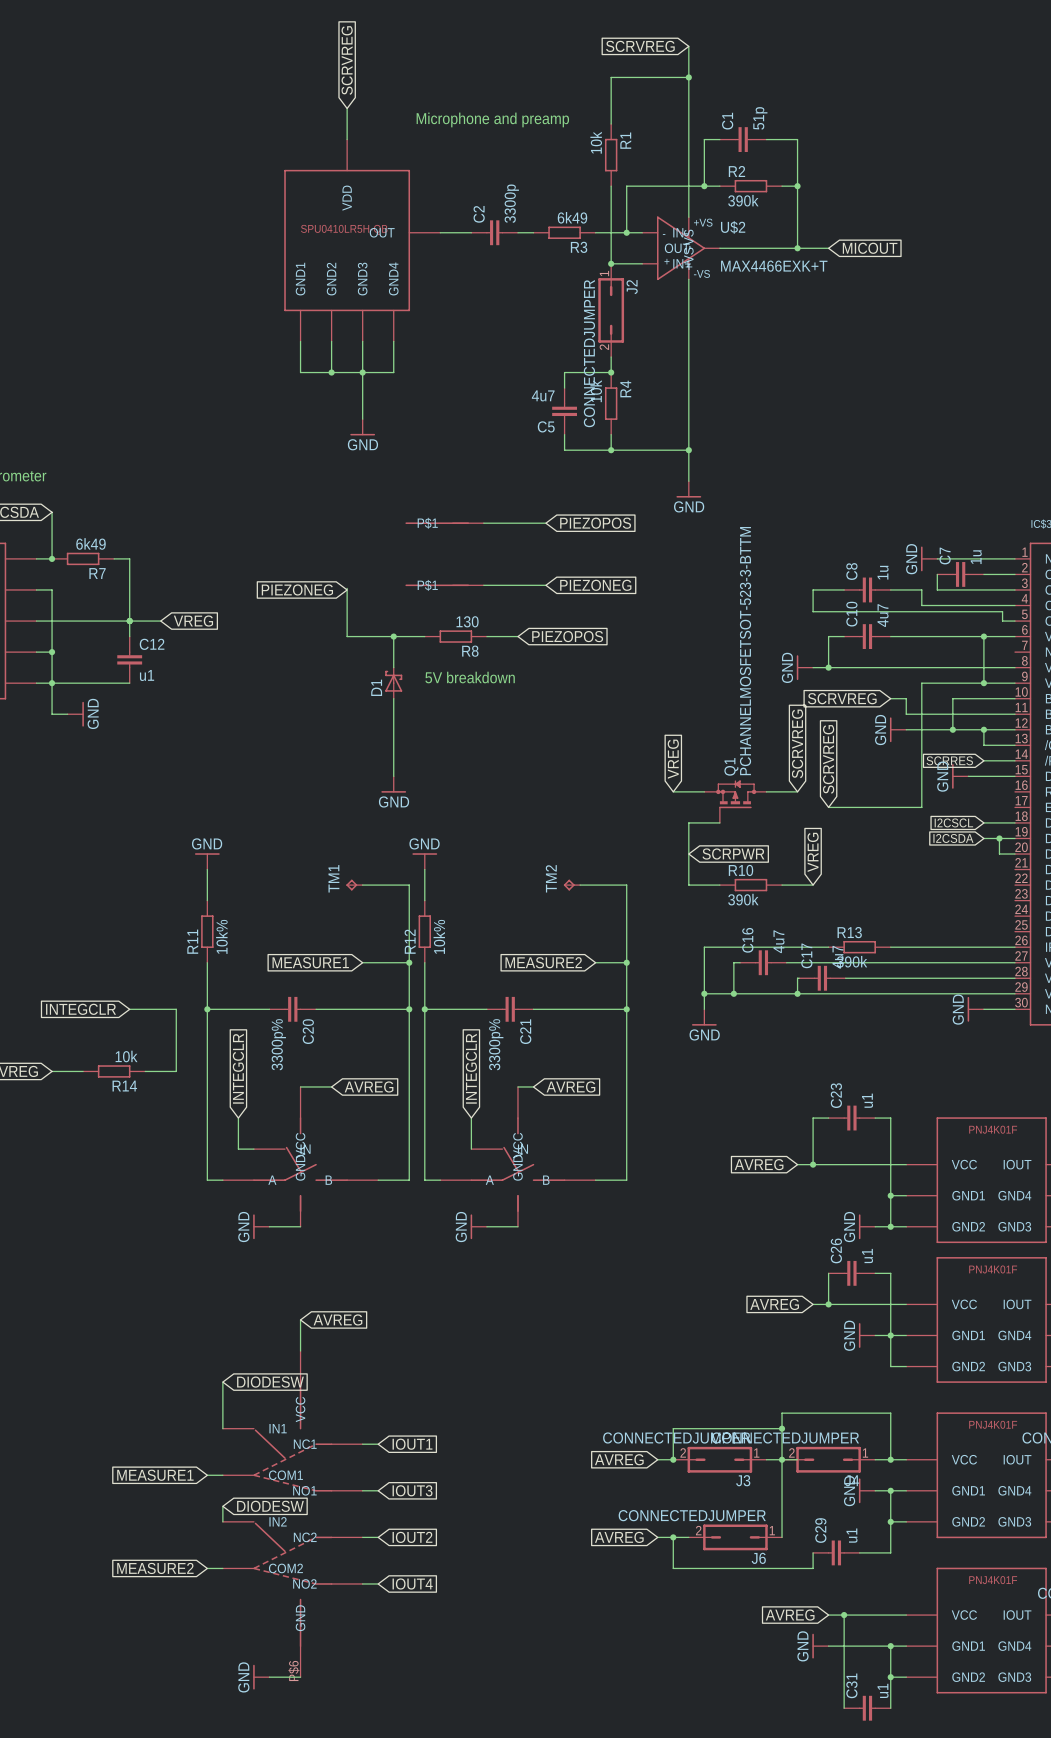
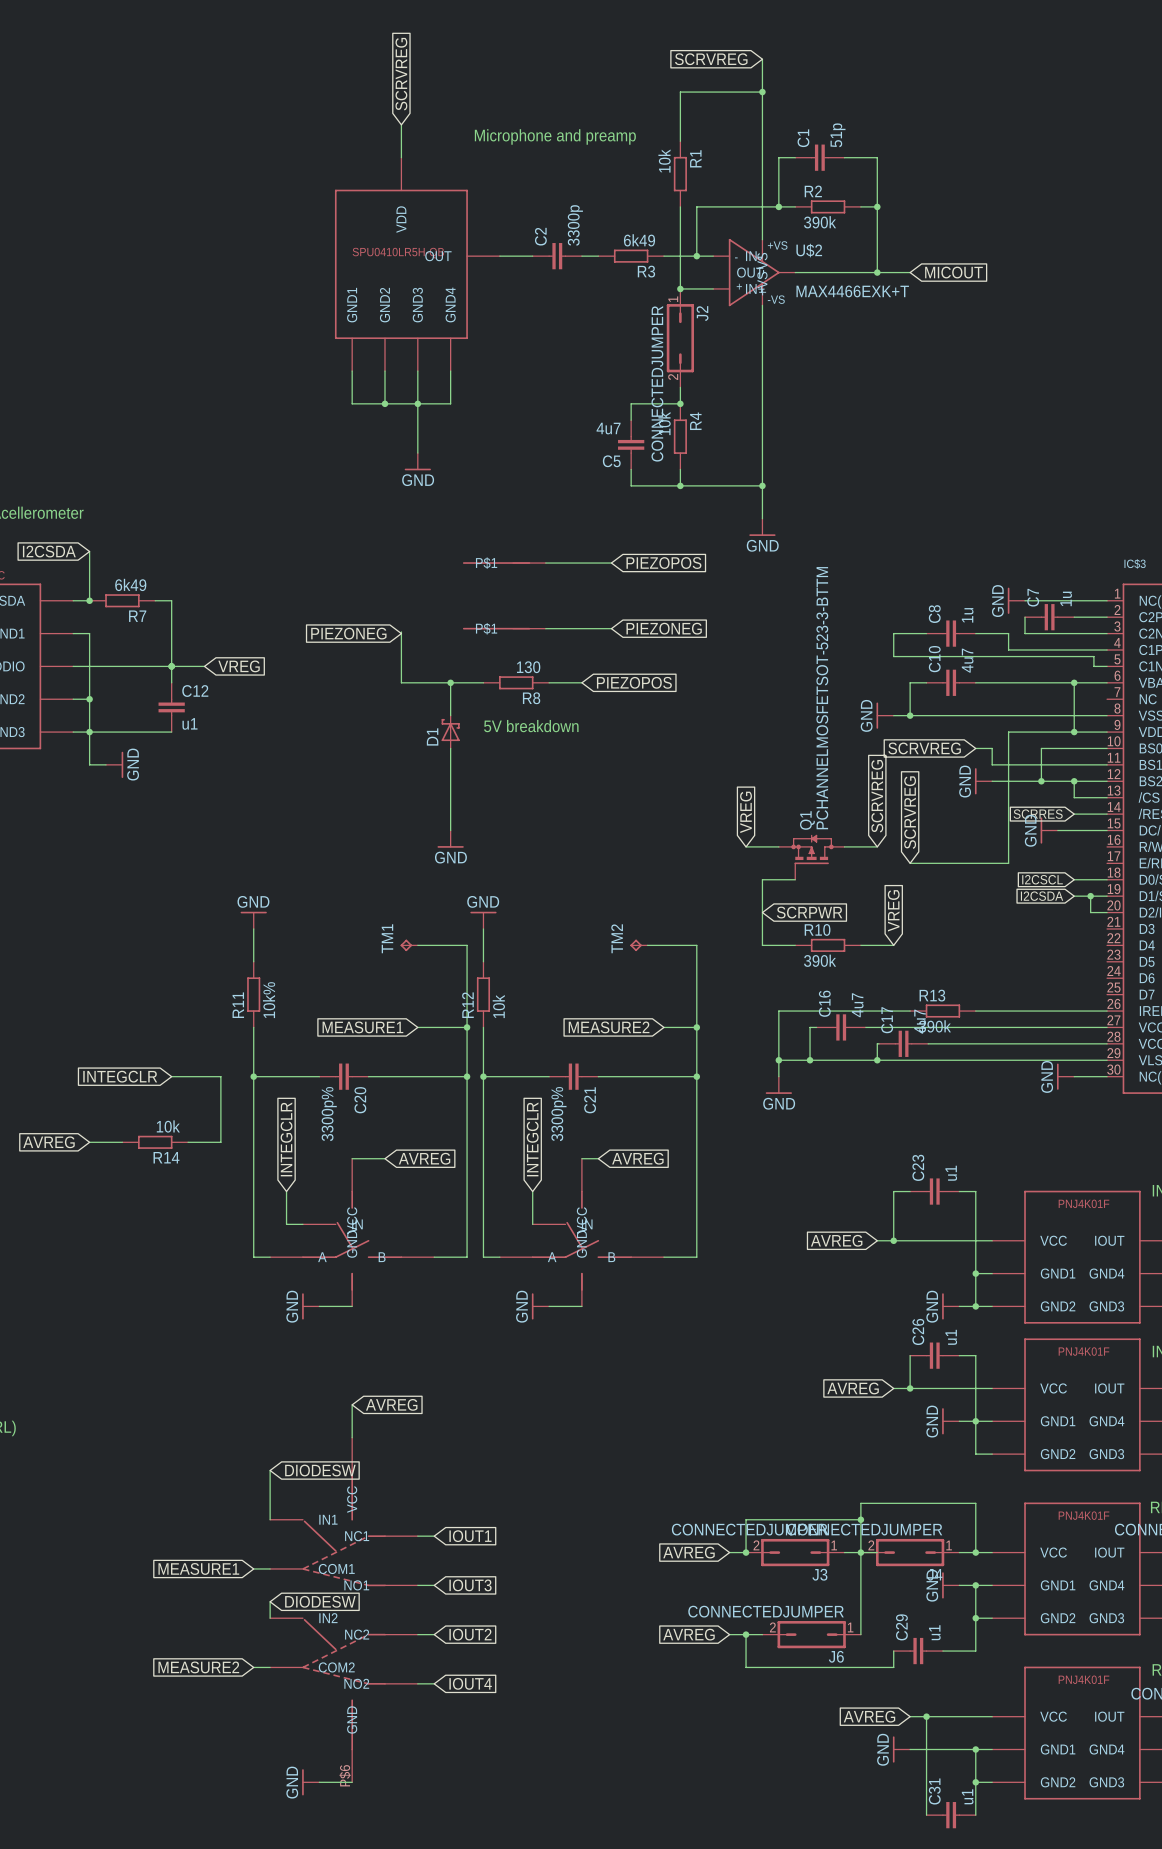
R12 value: 10k% (439, 936) -> 10k (498, 1006)

